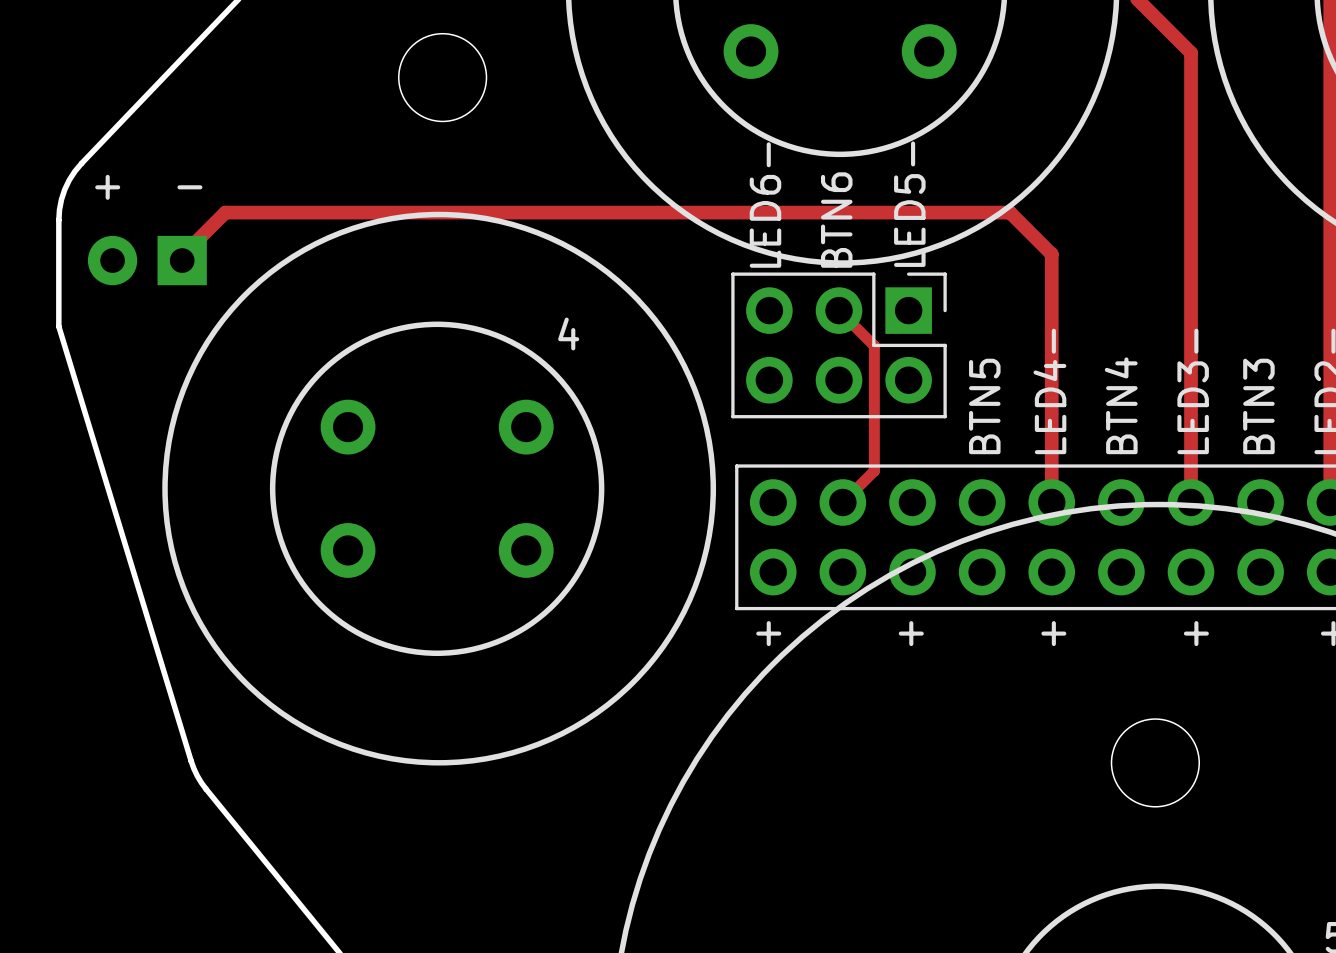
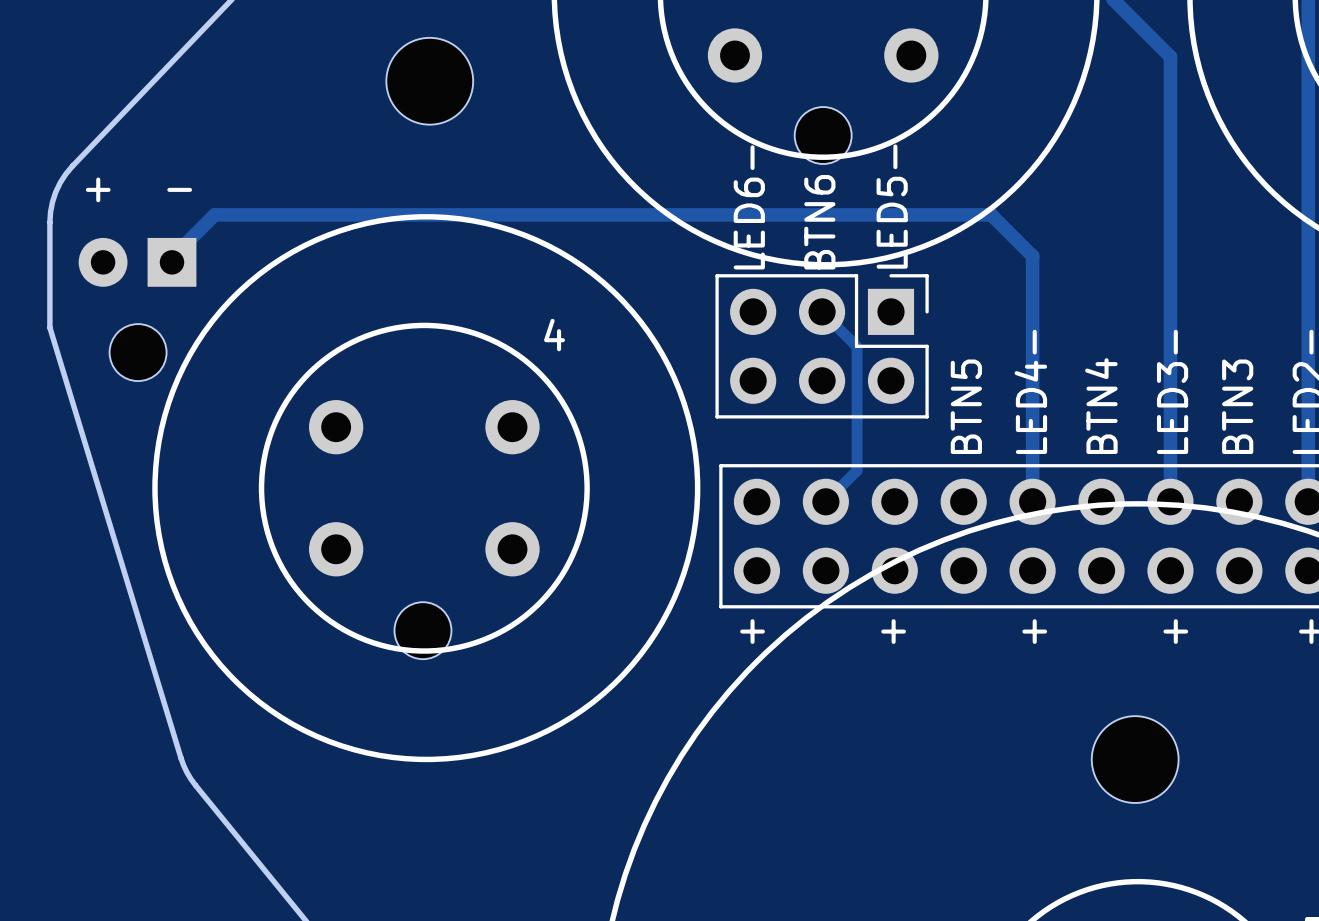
part: none -> (823, 135)
part: none -> (138, 352)
part: none -> (422, 630)

